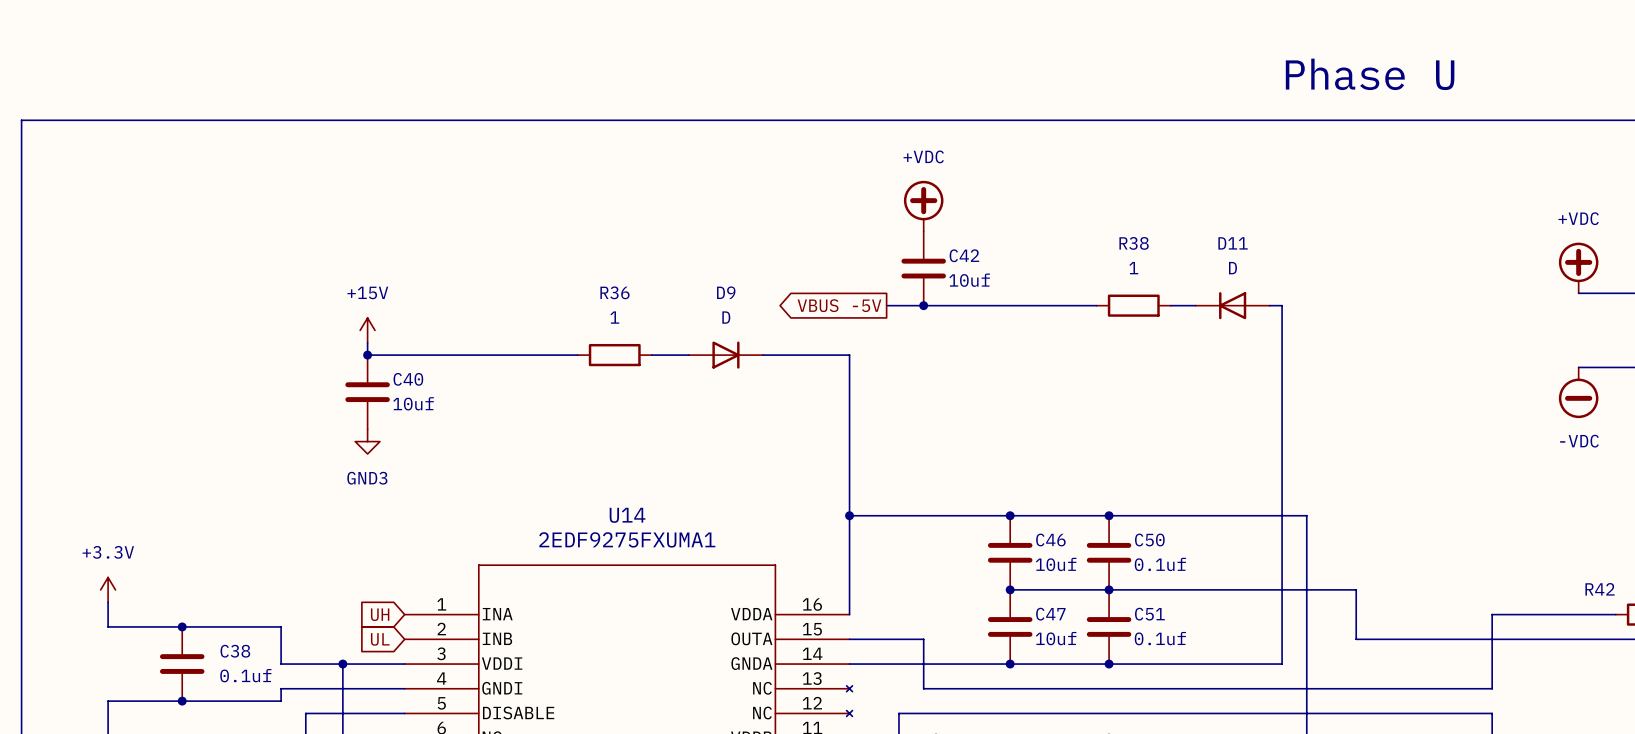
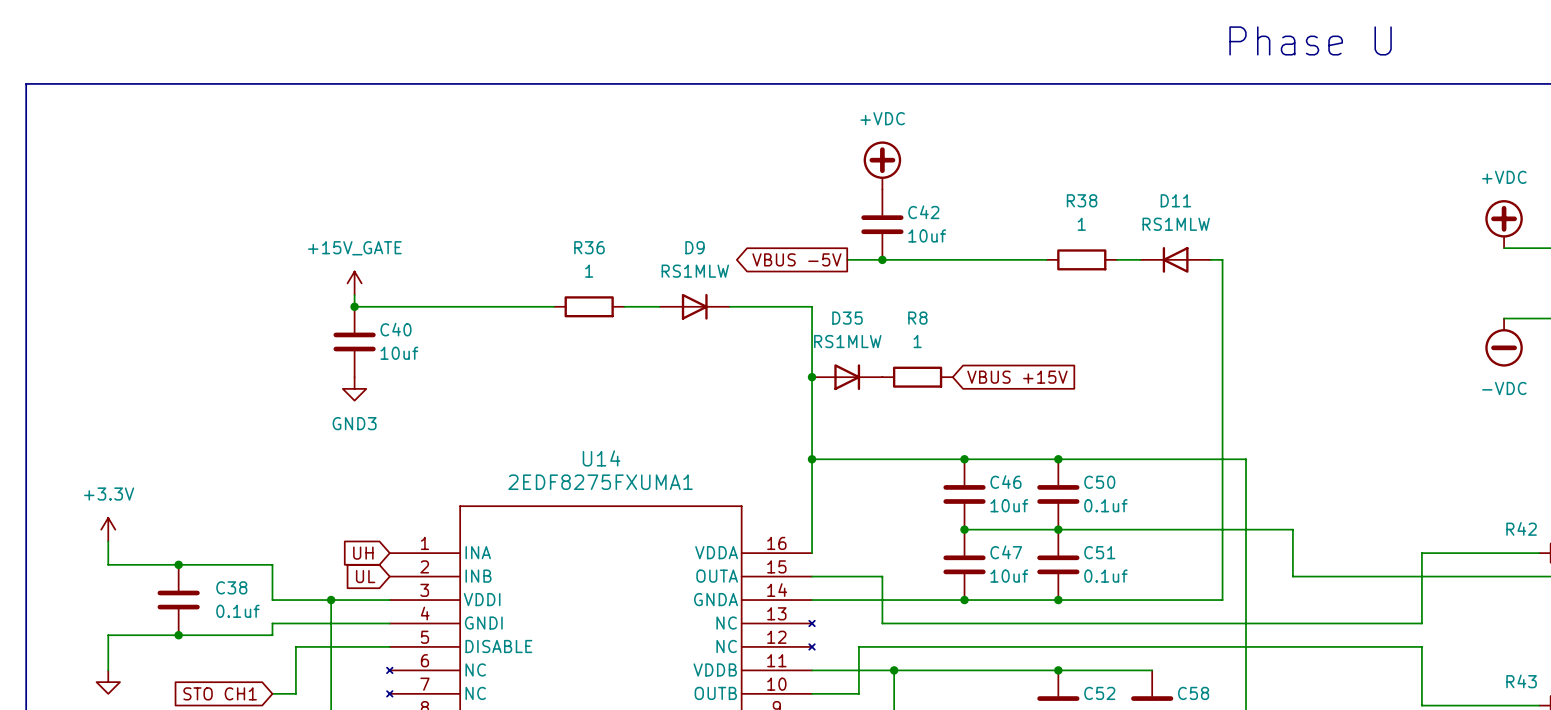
D11 value: D (1232, 268) -> RS1MLW (1176, 224)
D9 value: D (726, 317) -> RS1MLW (695, 271)
power symbol: +15V (367, 330) -> +15V_GATE (354, 283)
junction: none -> (812, 377)
D35: none -> RS1MLW (847, 377)
R8: none -> 1 (917, 377)
global label: none -> VBUS +15V (1017, 377)
U14 value: 2EDF9275FXUMA1 (627, 539) -> 2EDF8275FXUMA1 (600, 482)

